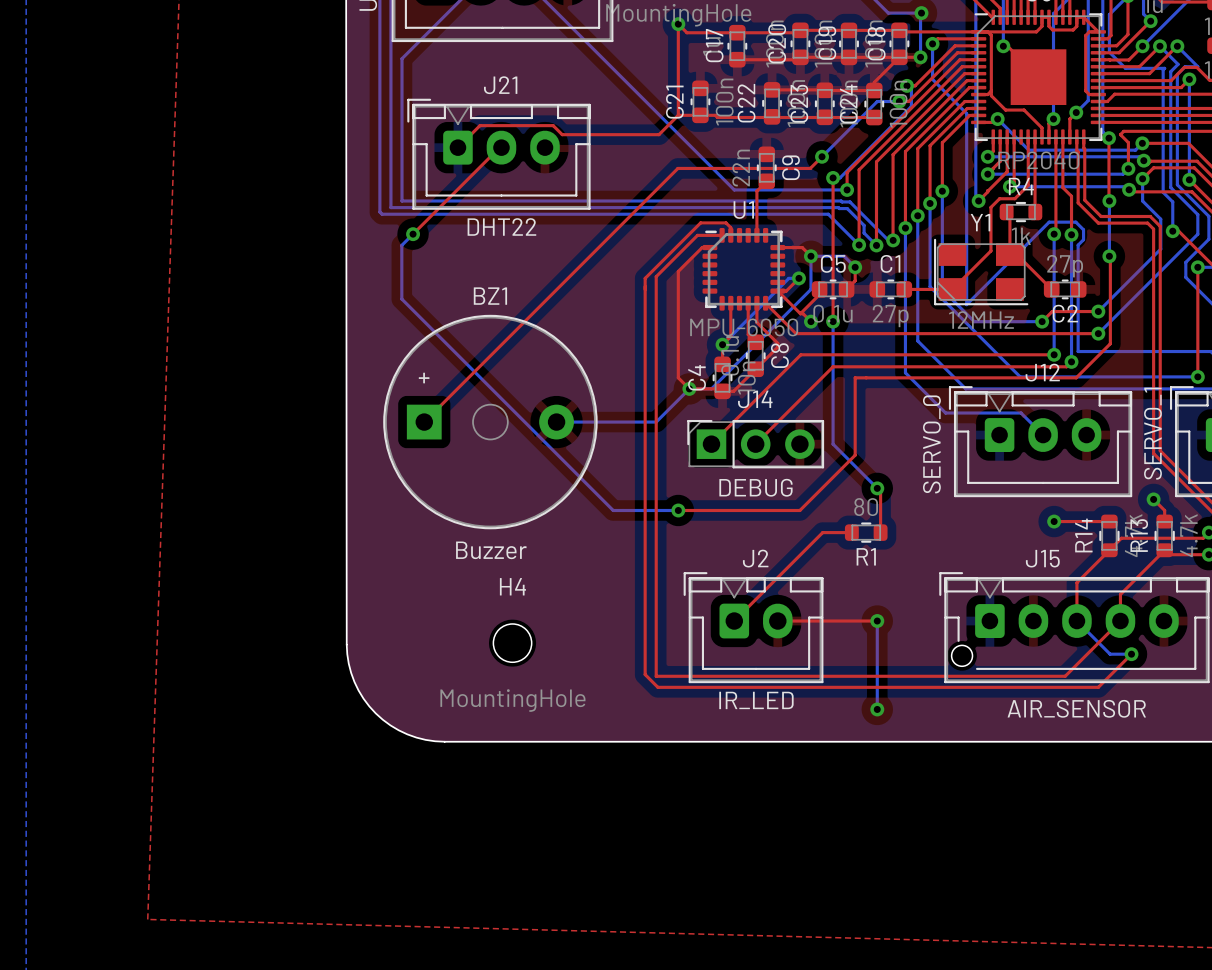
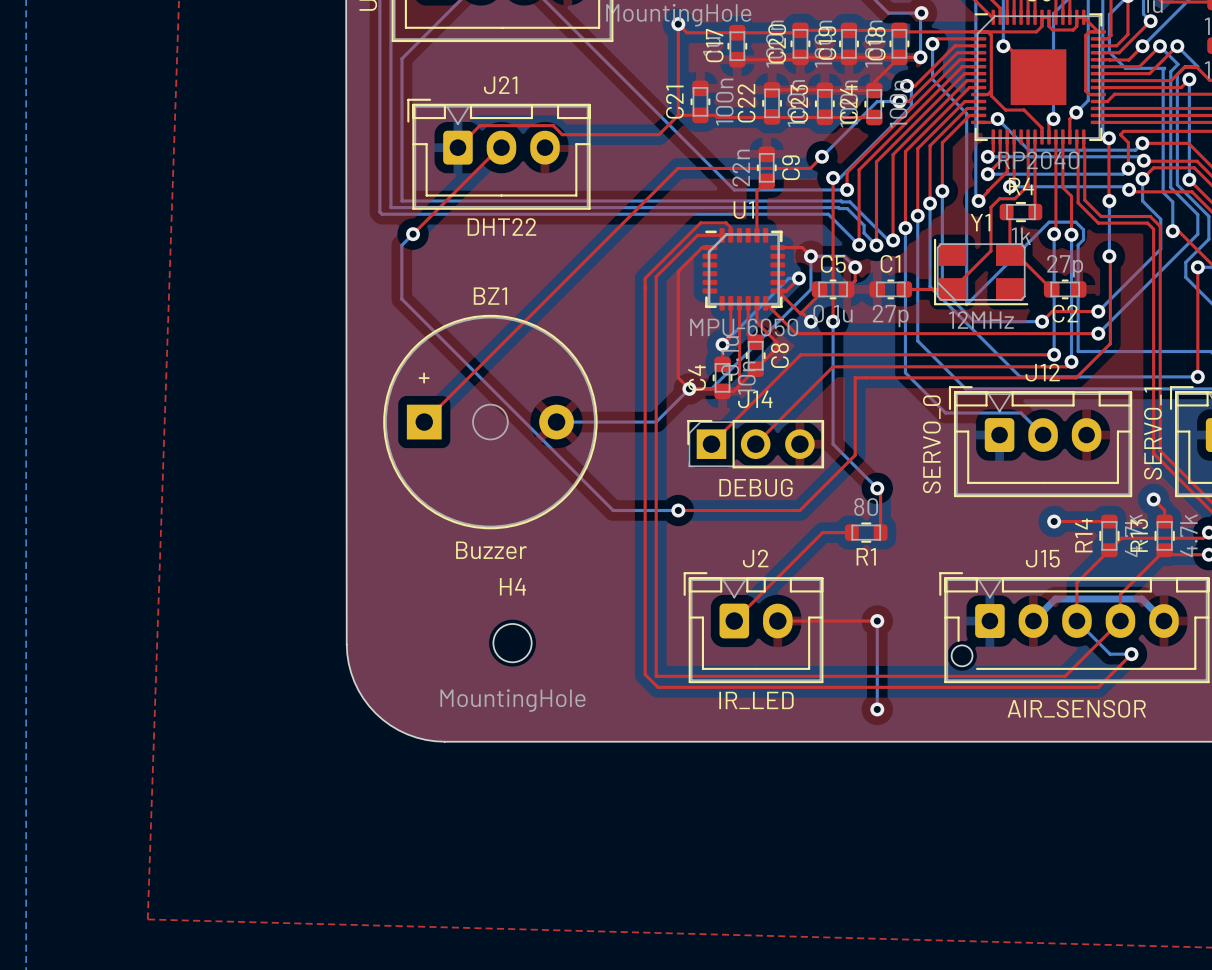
top track: none -> (739, 303) (739, 385)
bottom track: none -> (1033, 621) (1055, 599) (1141, 599) (1163, 621)

